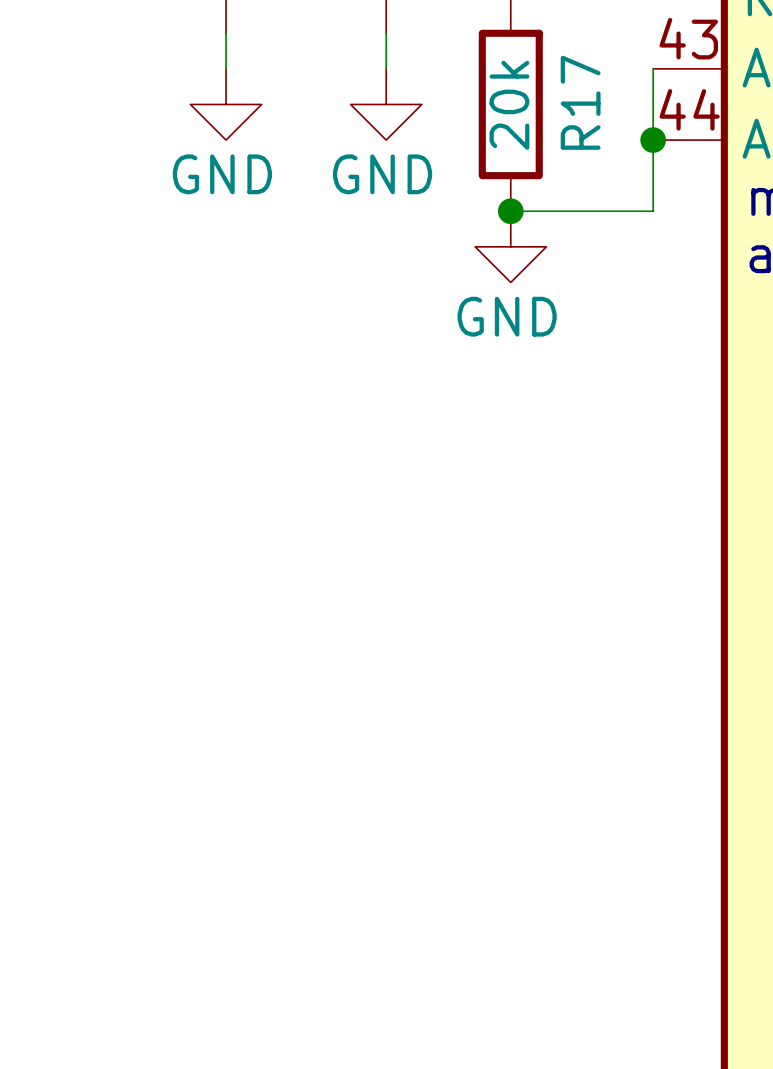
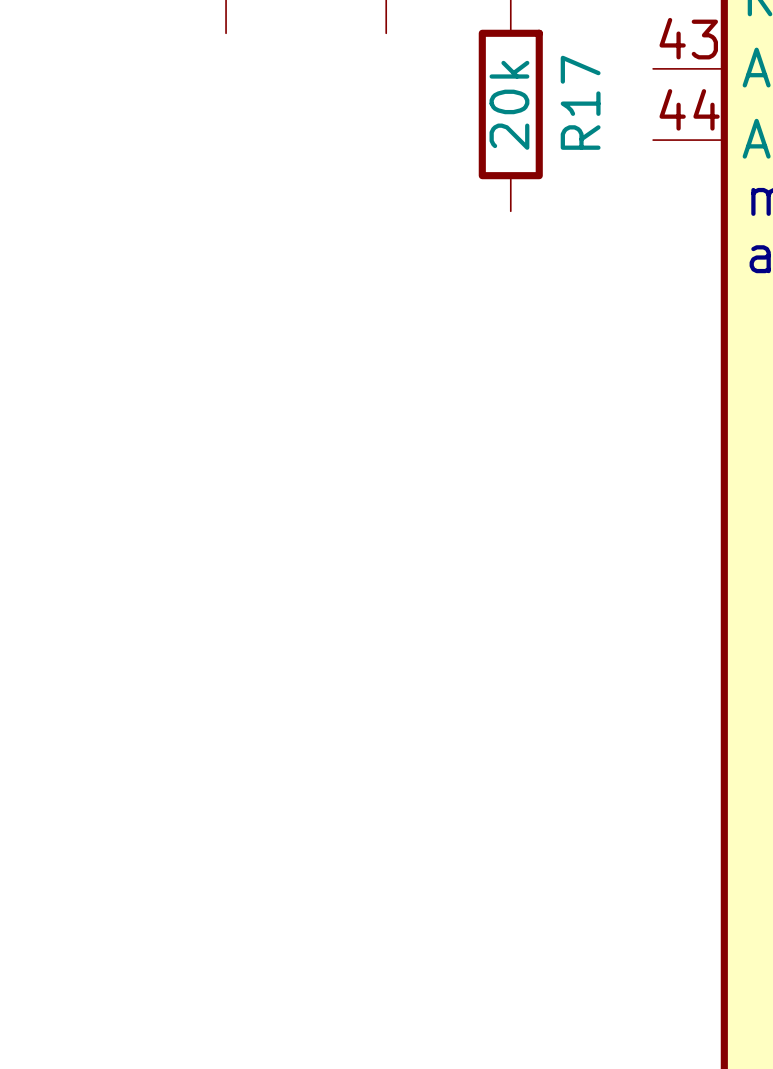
wire: (226, 33) (226, 68) -> none
wire: (386, 33) (386, 68) -> none
wire: (653, 68) (653, 211) (510, 211) -> none
power symbol: GND (226, 104) -> none
power symbol: GND (386, 104) -> none
junction: (653, 140) -> none
junction: (510, 211) -> none
power symbol: GND (510, 246) -> none

